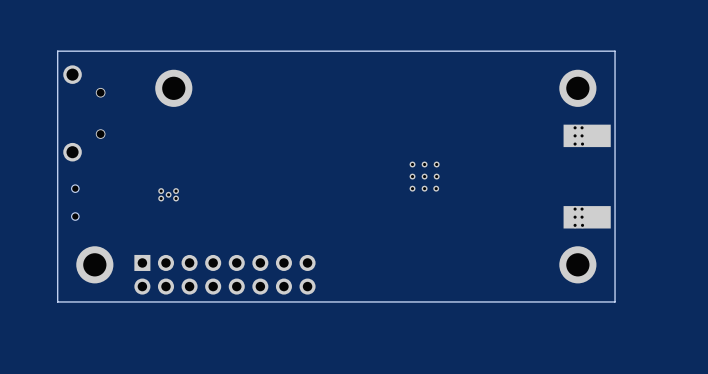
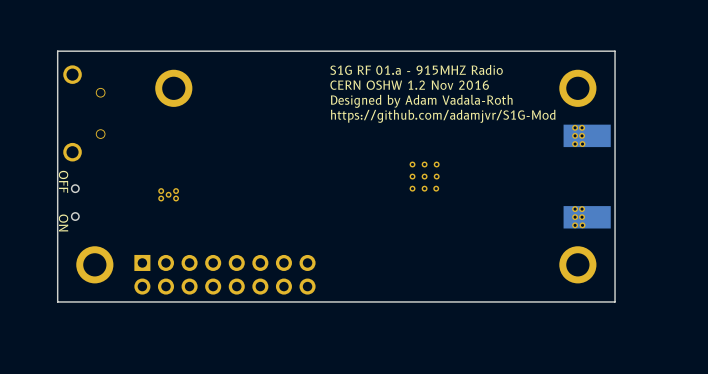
text: none -> S1G RF 01.a - 915MHZ Radio (416, 69)
text: none -> CERN OSHW 1.2 Nov 2016 (409, 85)
text: none -> Designed by Adam Vadala-Roth (421, 101)
text: none -> https://github.com/adamjvr/S1G-Mod (443, 116)
text: none -> OFF (63, 181)
text: none -> ON (63, 222)

